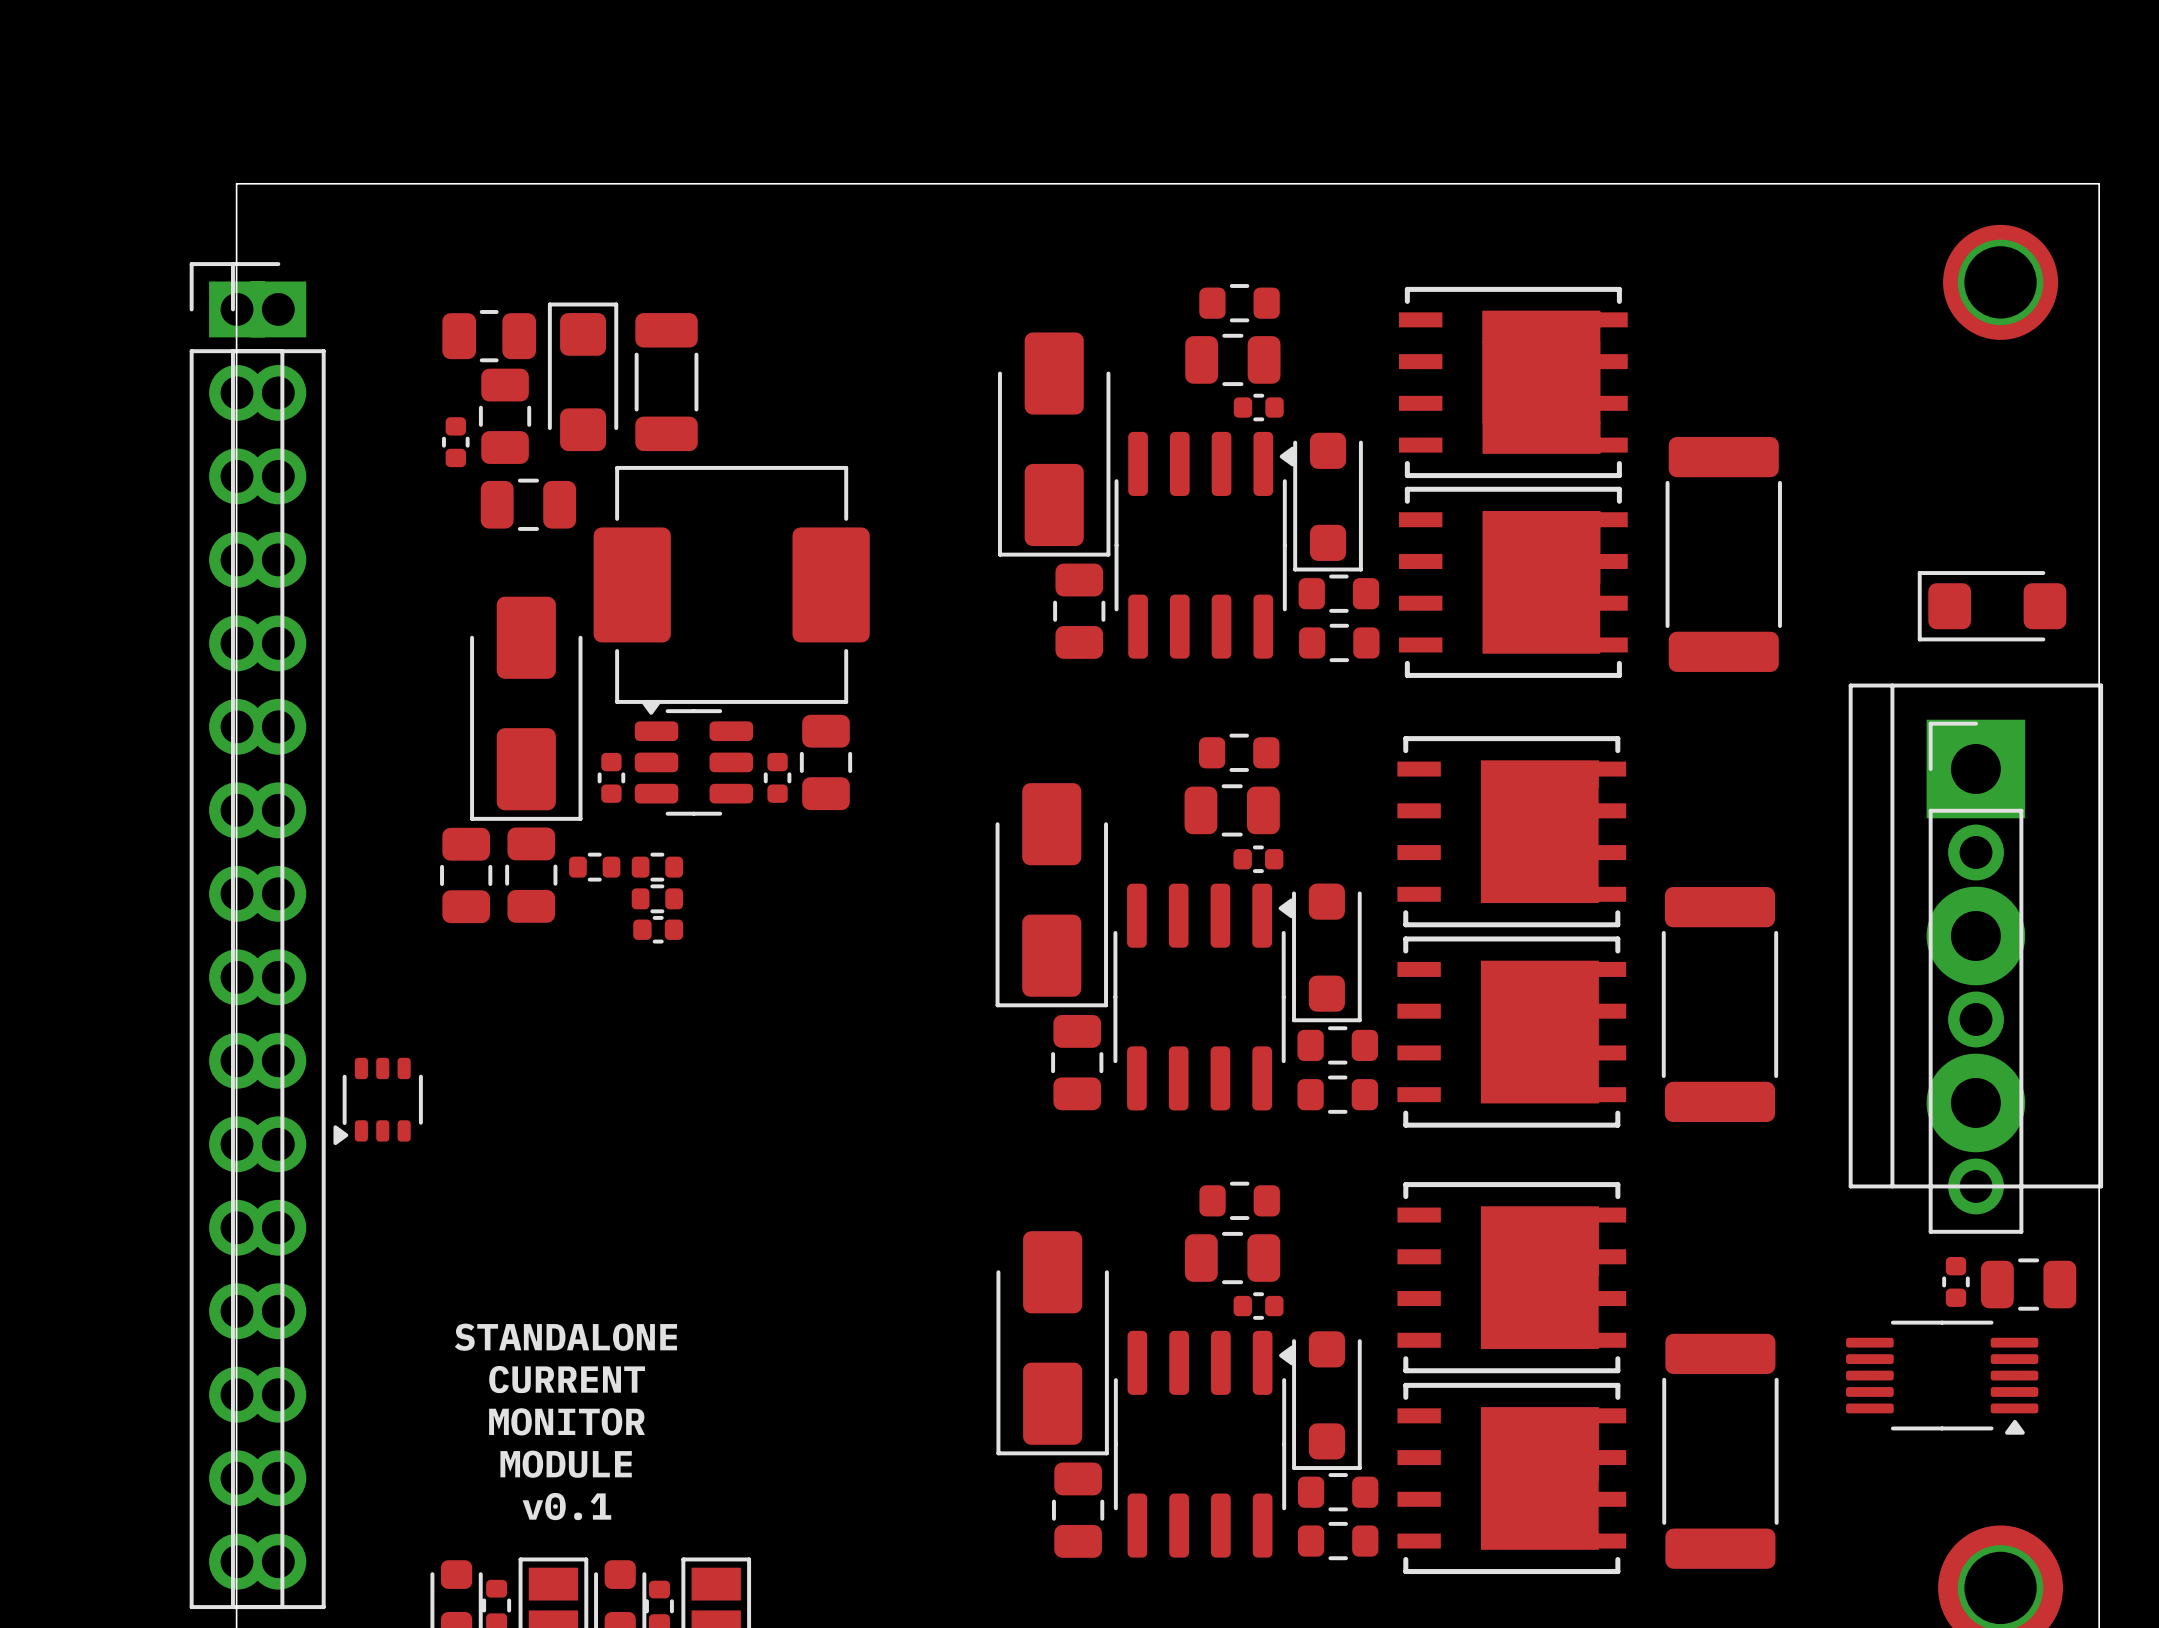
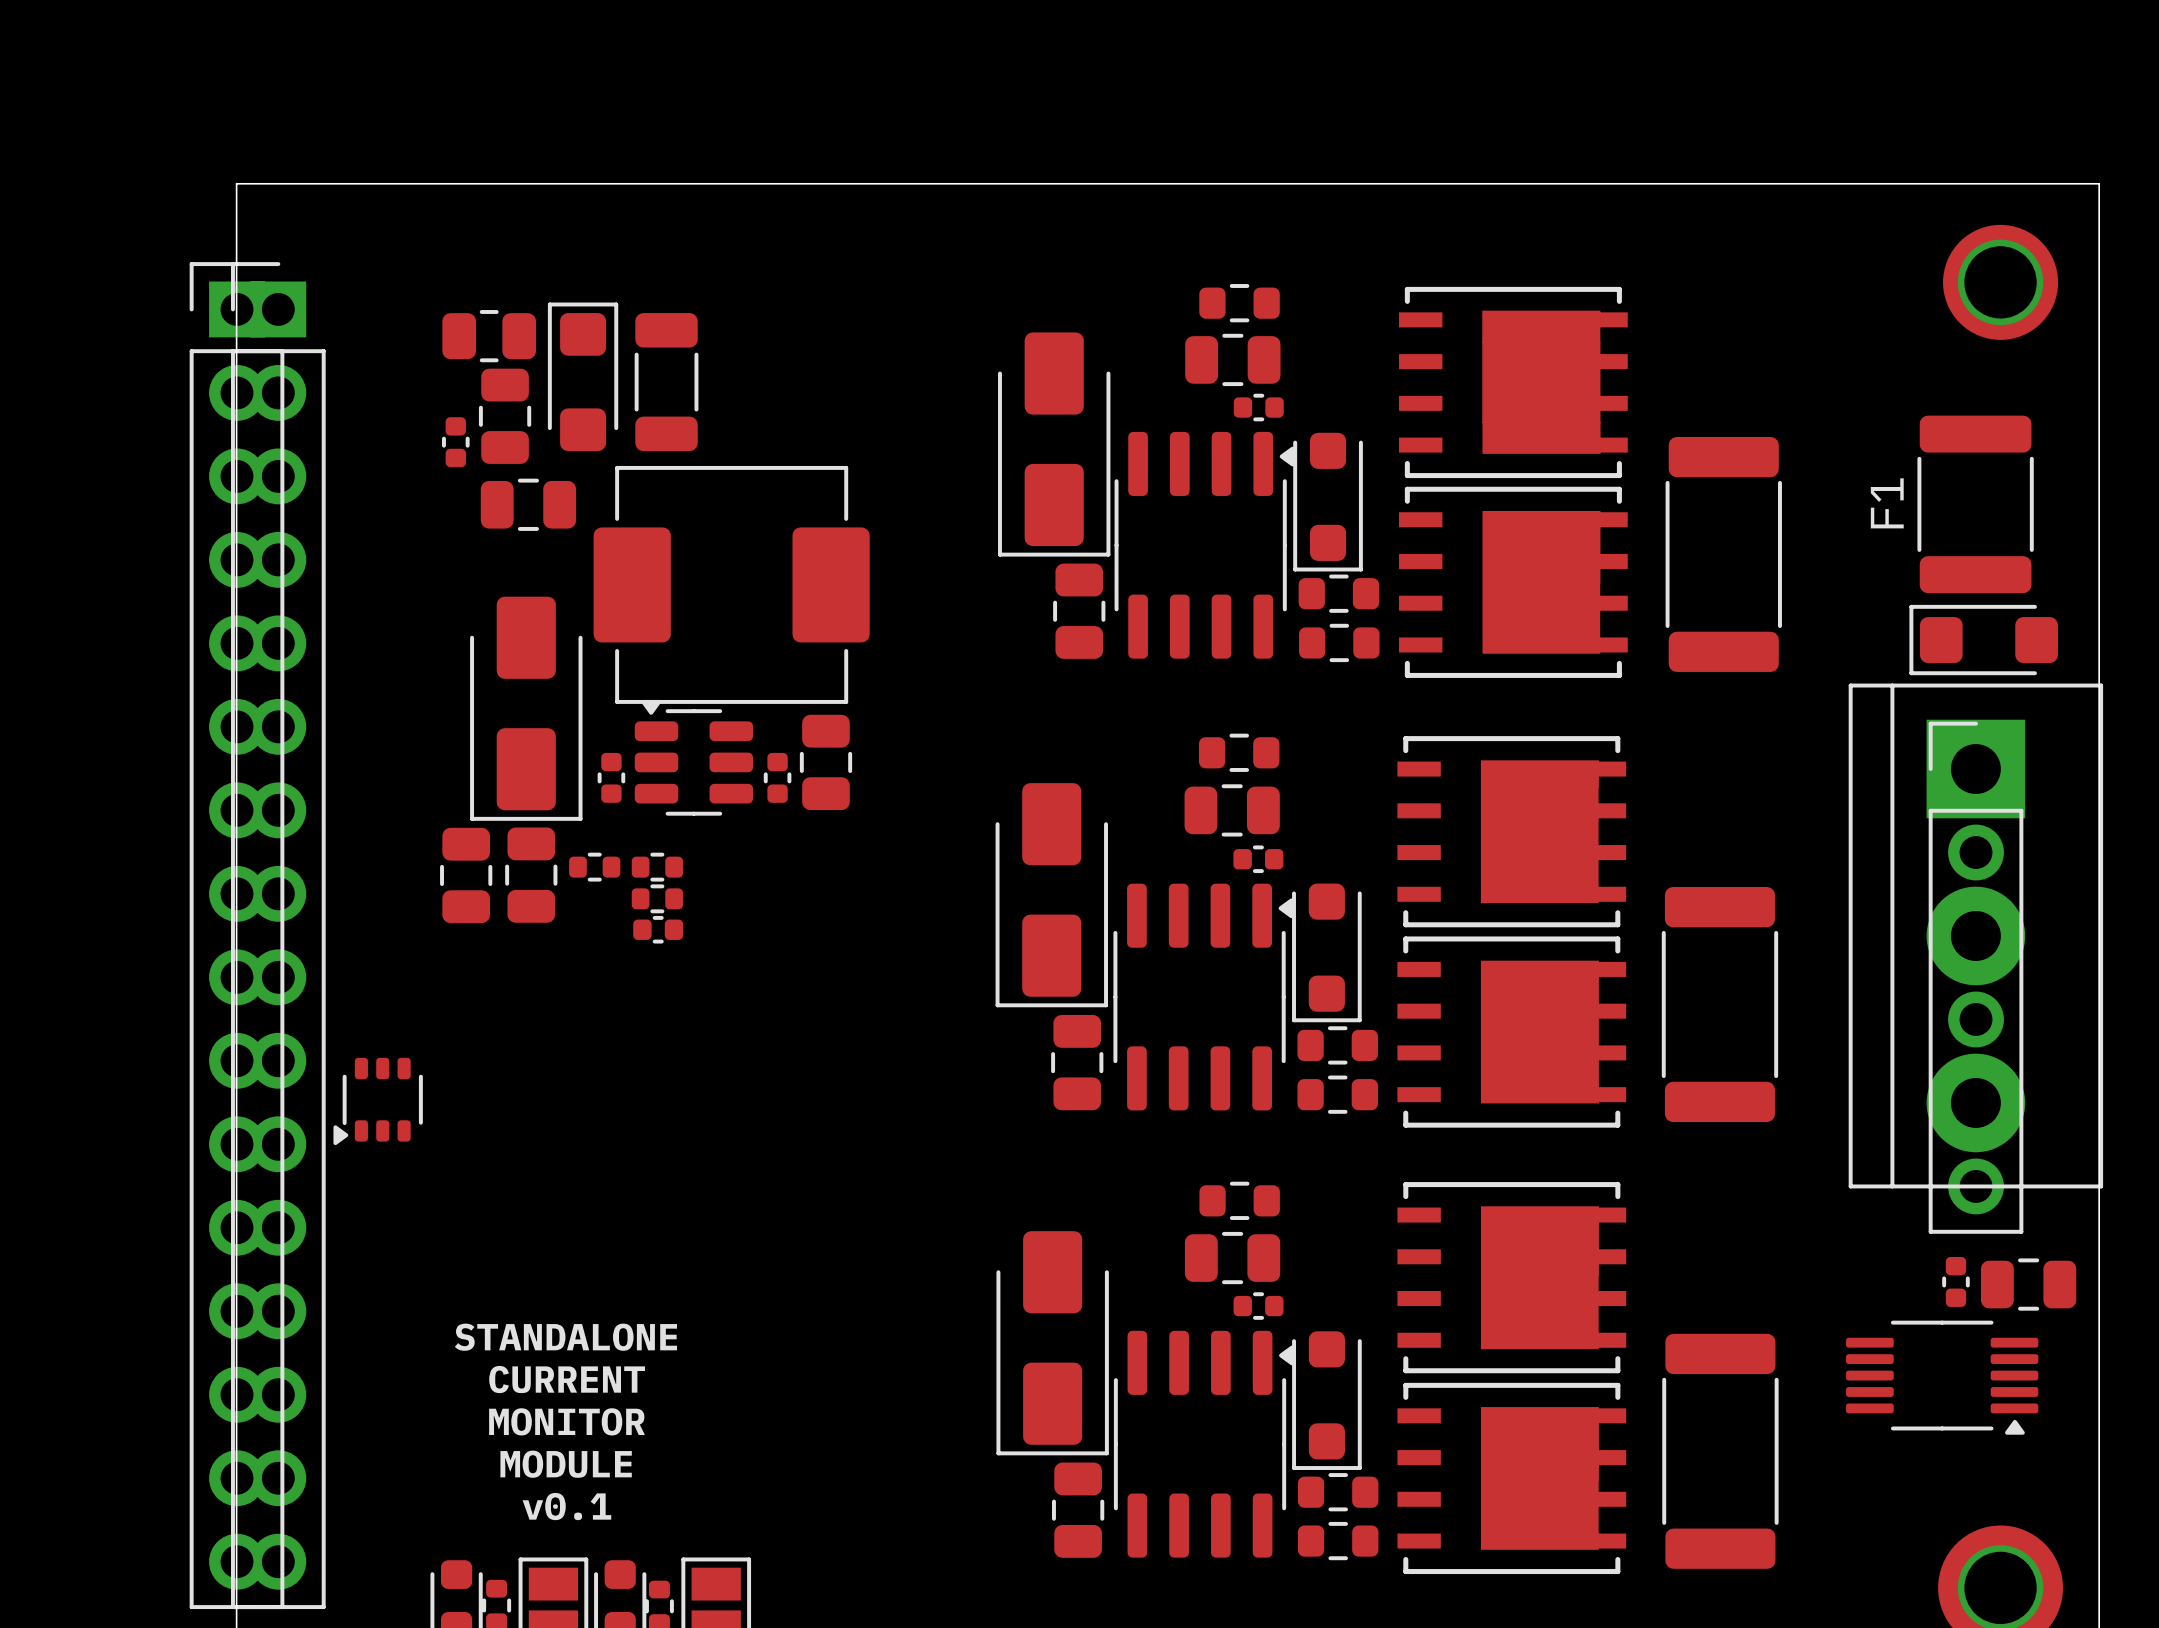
F1: none -> (1975, 504)
part position: (1992, 606) -> (1983, 640)

